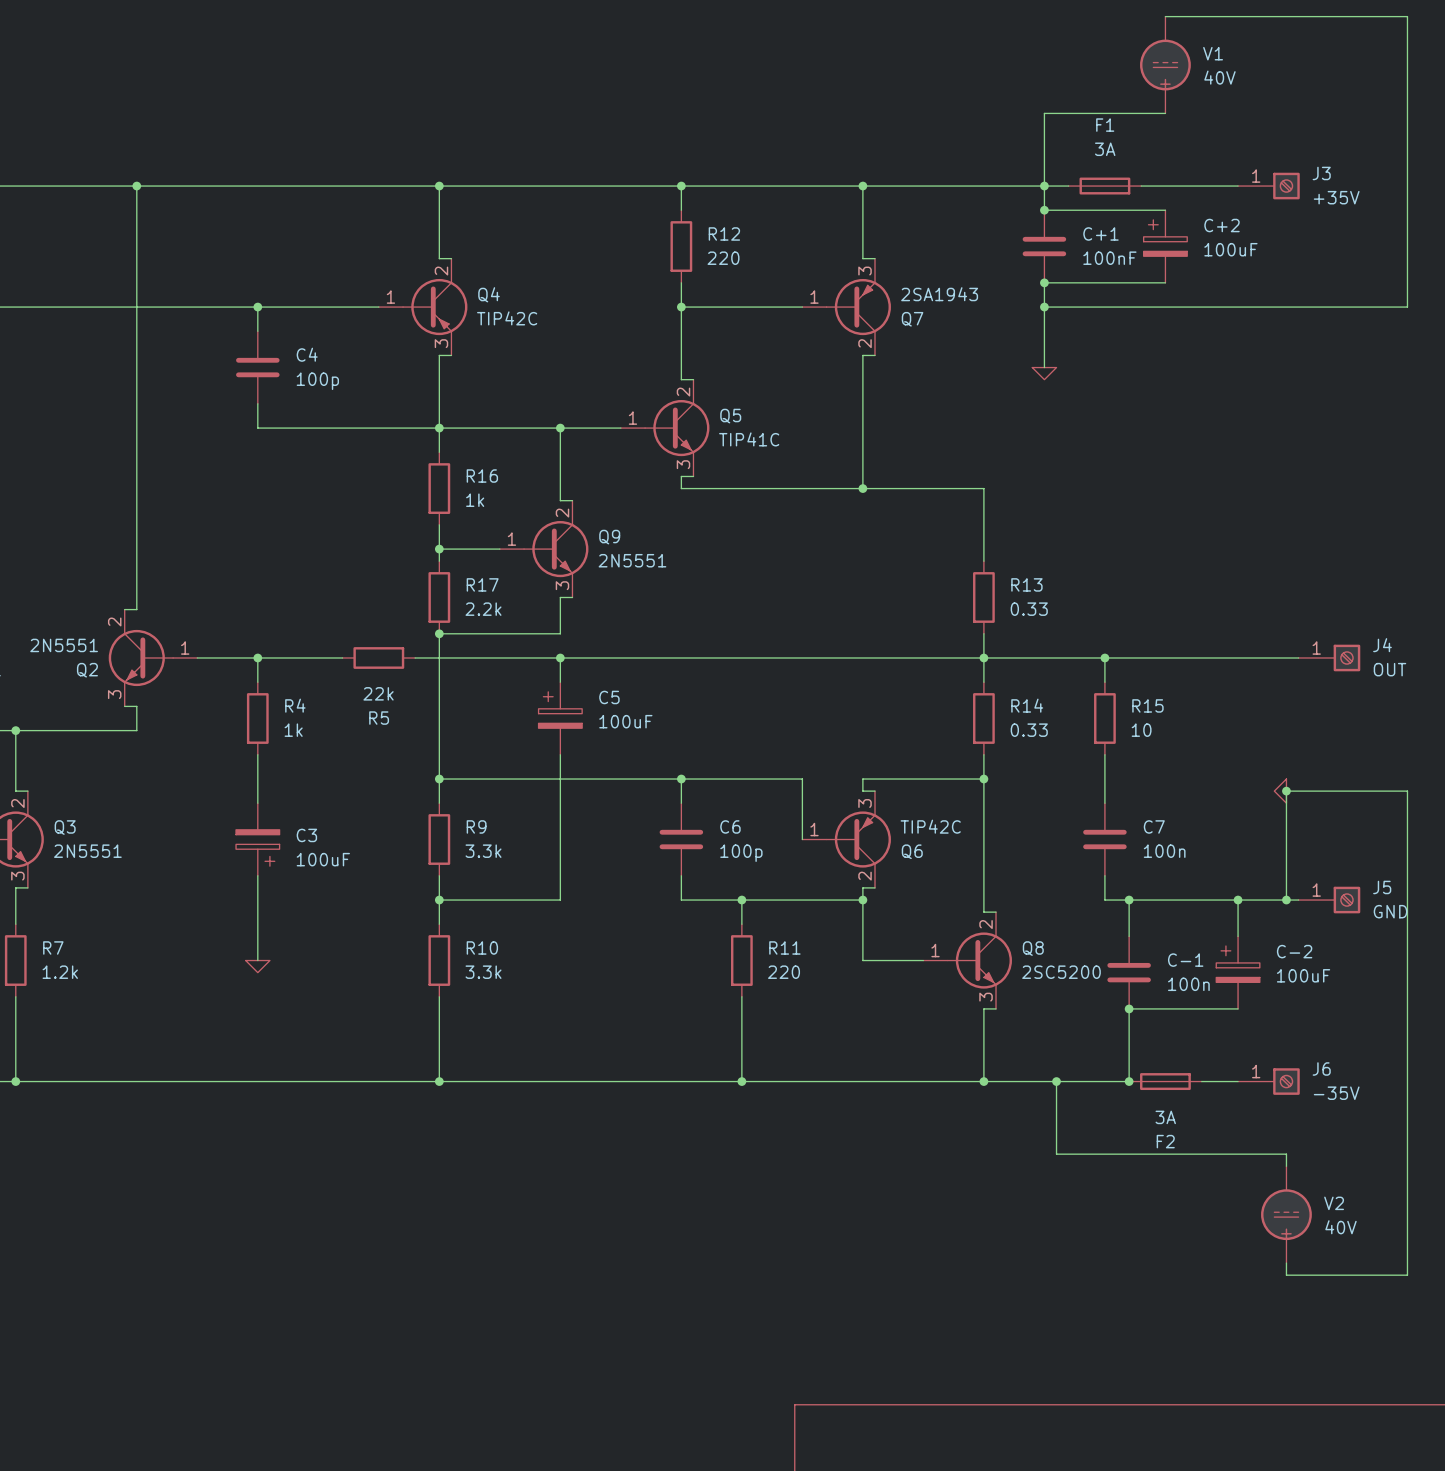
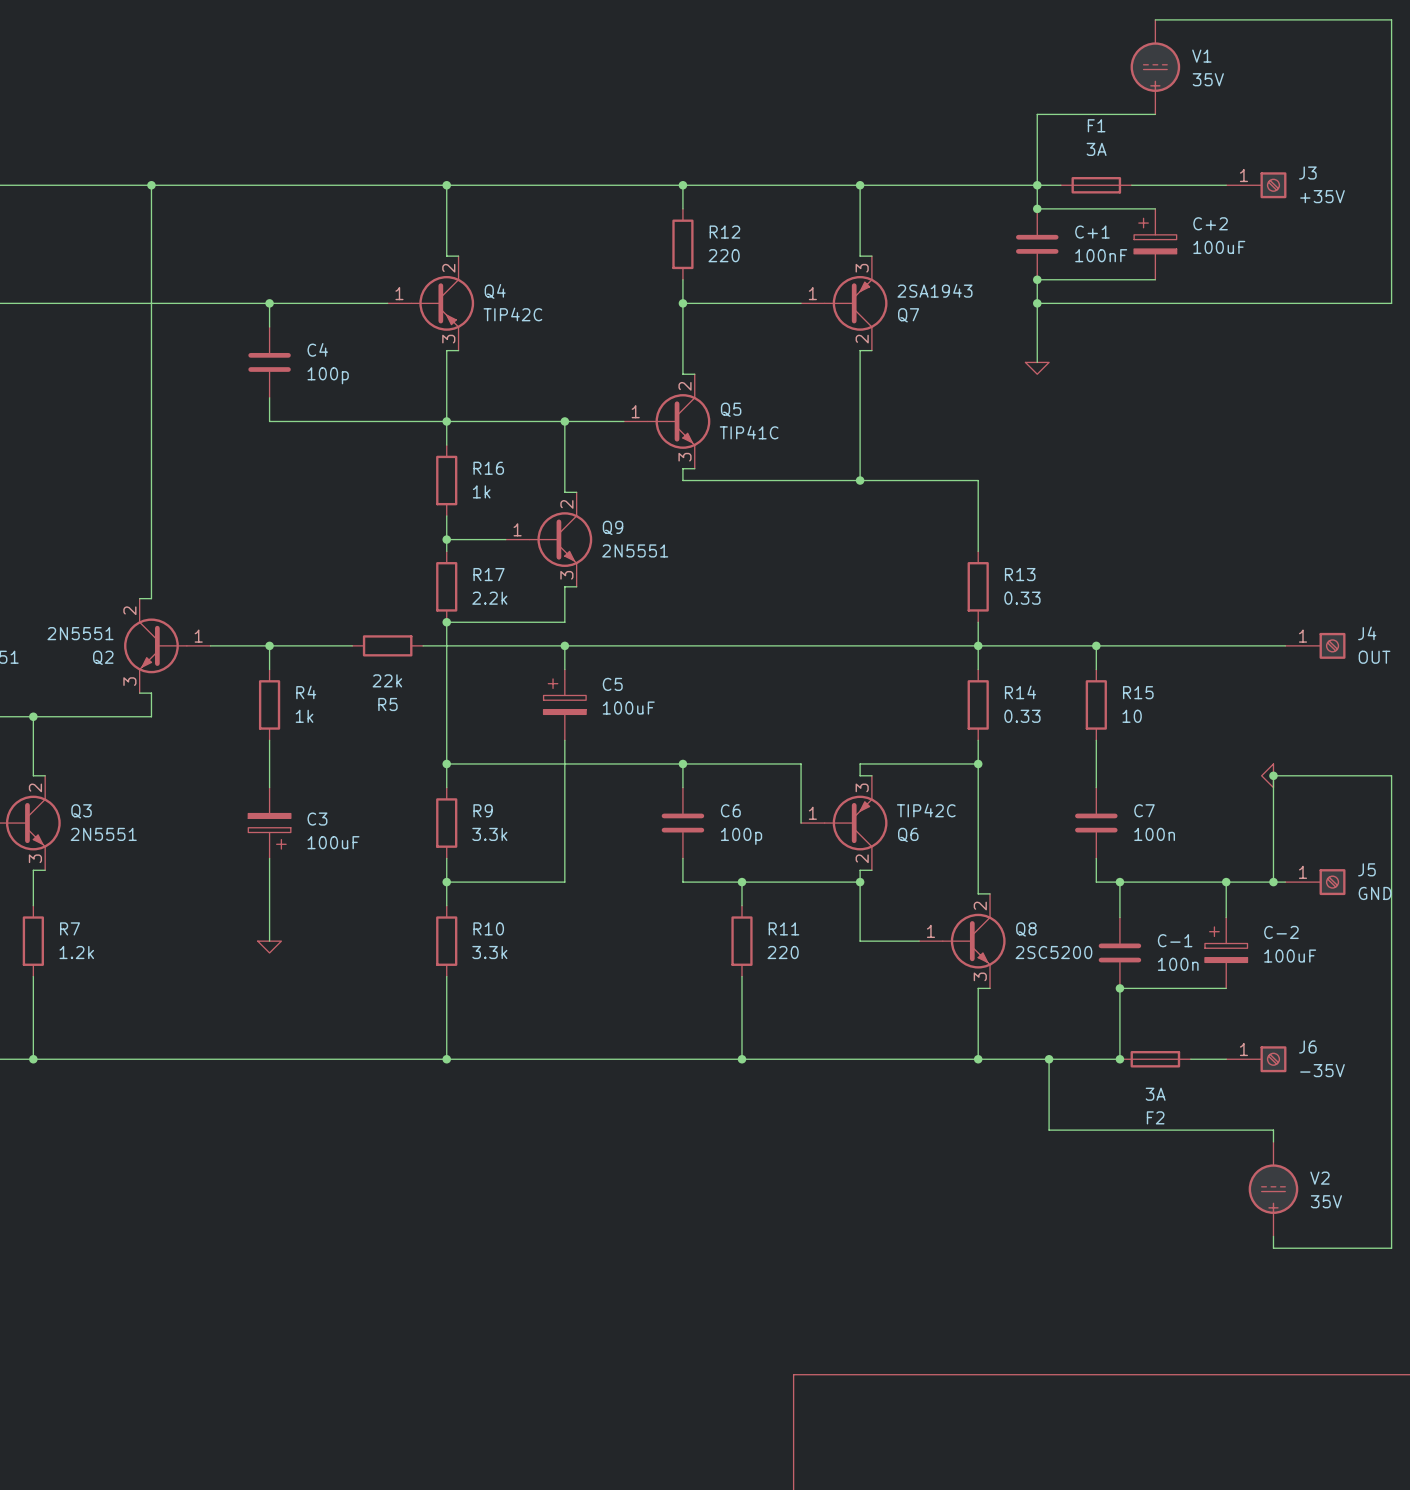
V1 value: 40V (1219, 77) -> 35V (1208, 79)
V2 value: 40V (1341, 1227) -> 35V (1326, 1201)

